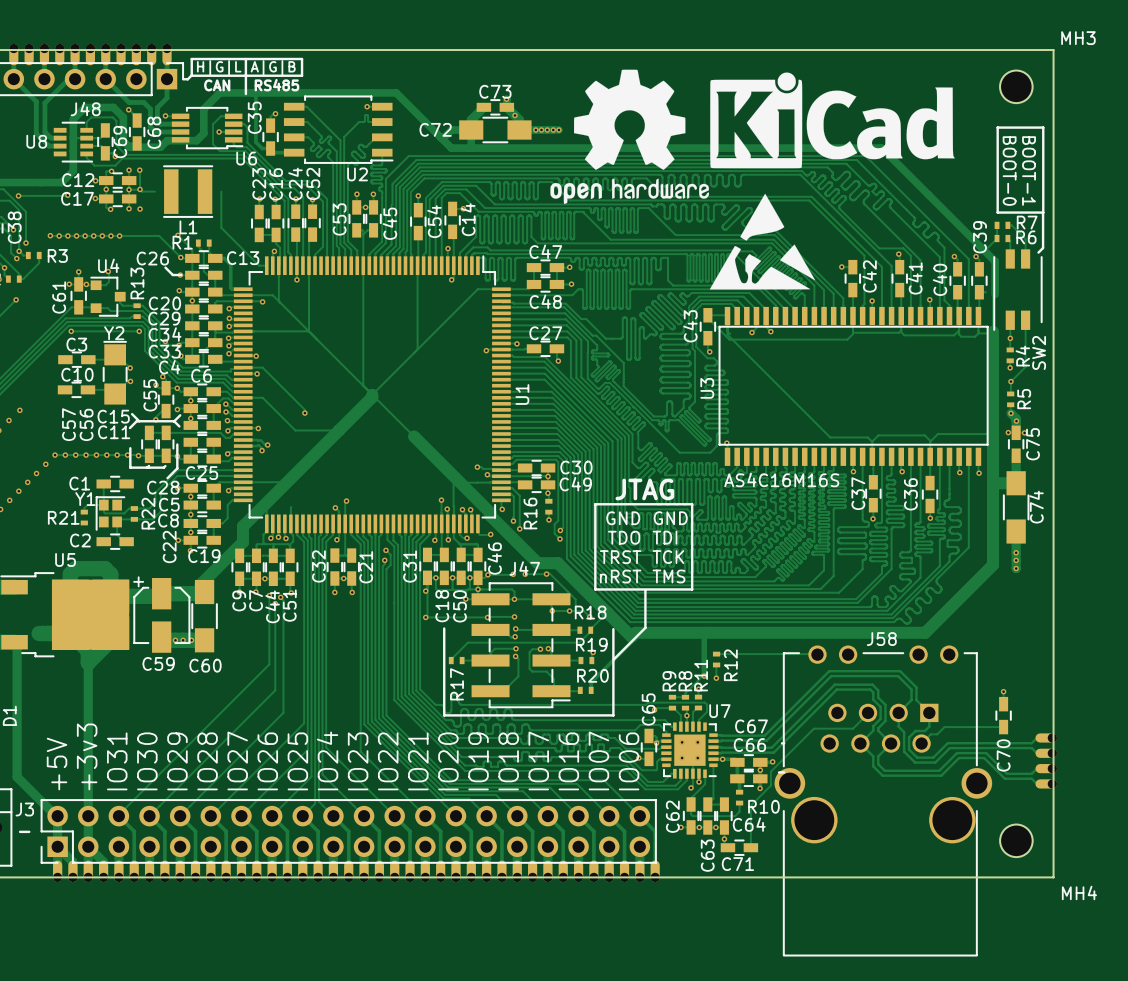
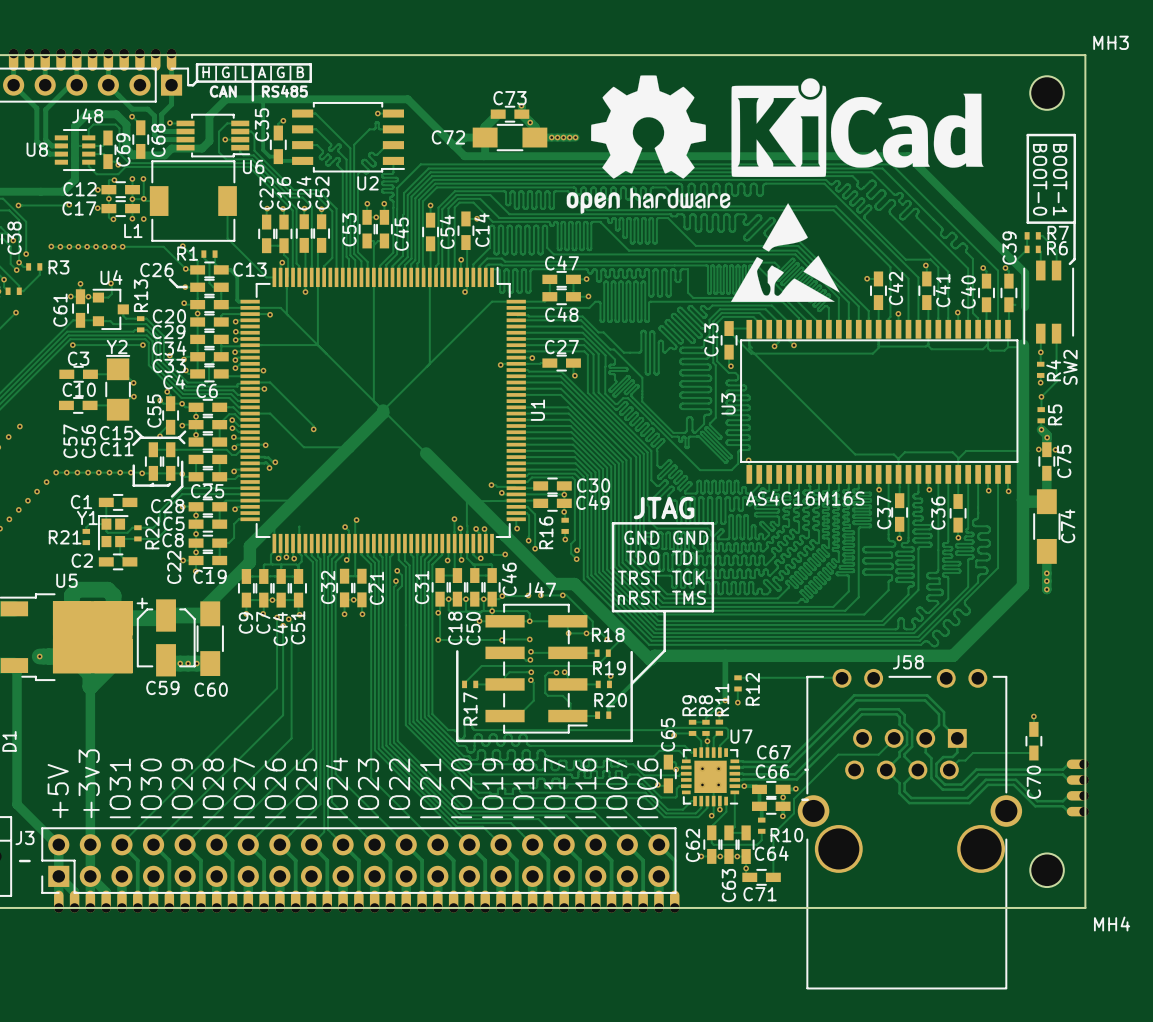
L1 footprint: [163, 165, 214, 218] -> [149, 160, 237, 242]
L1 name position: L1 (188, 227) -> L1 (133, 230)
via: none -> (39, 656)

